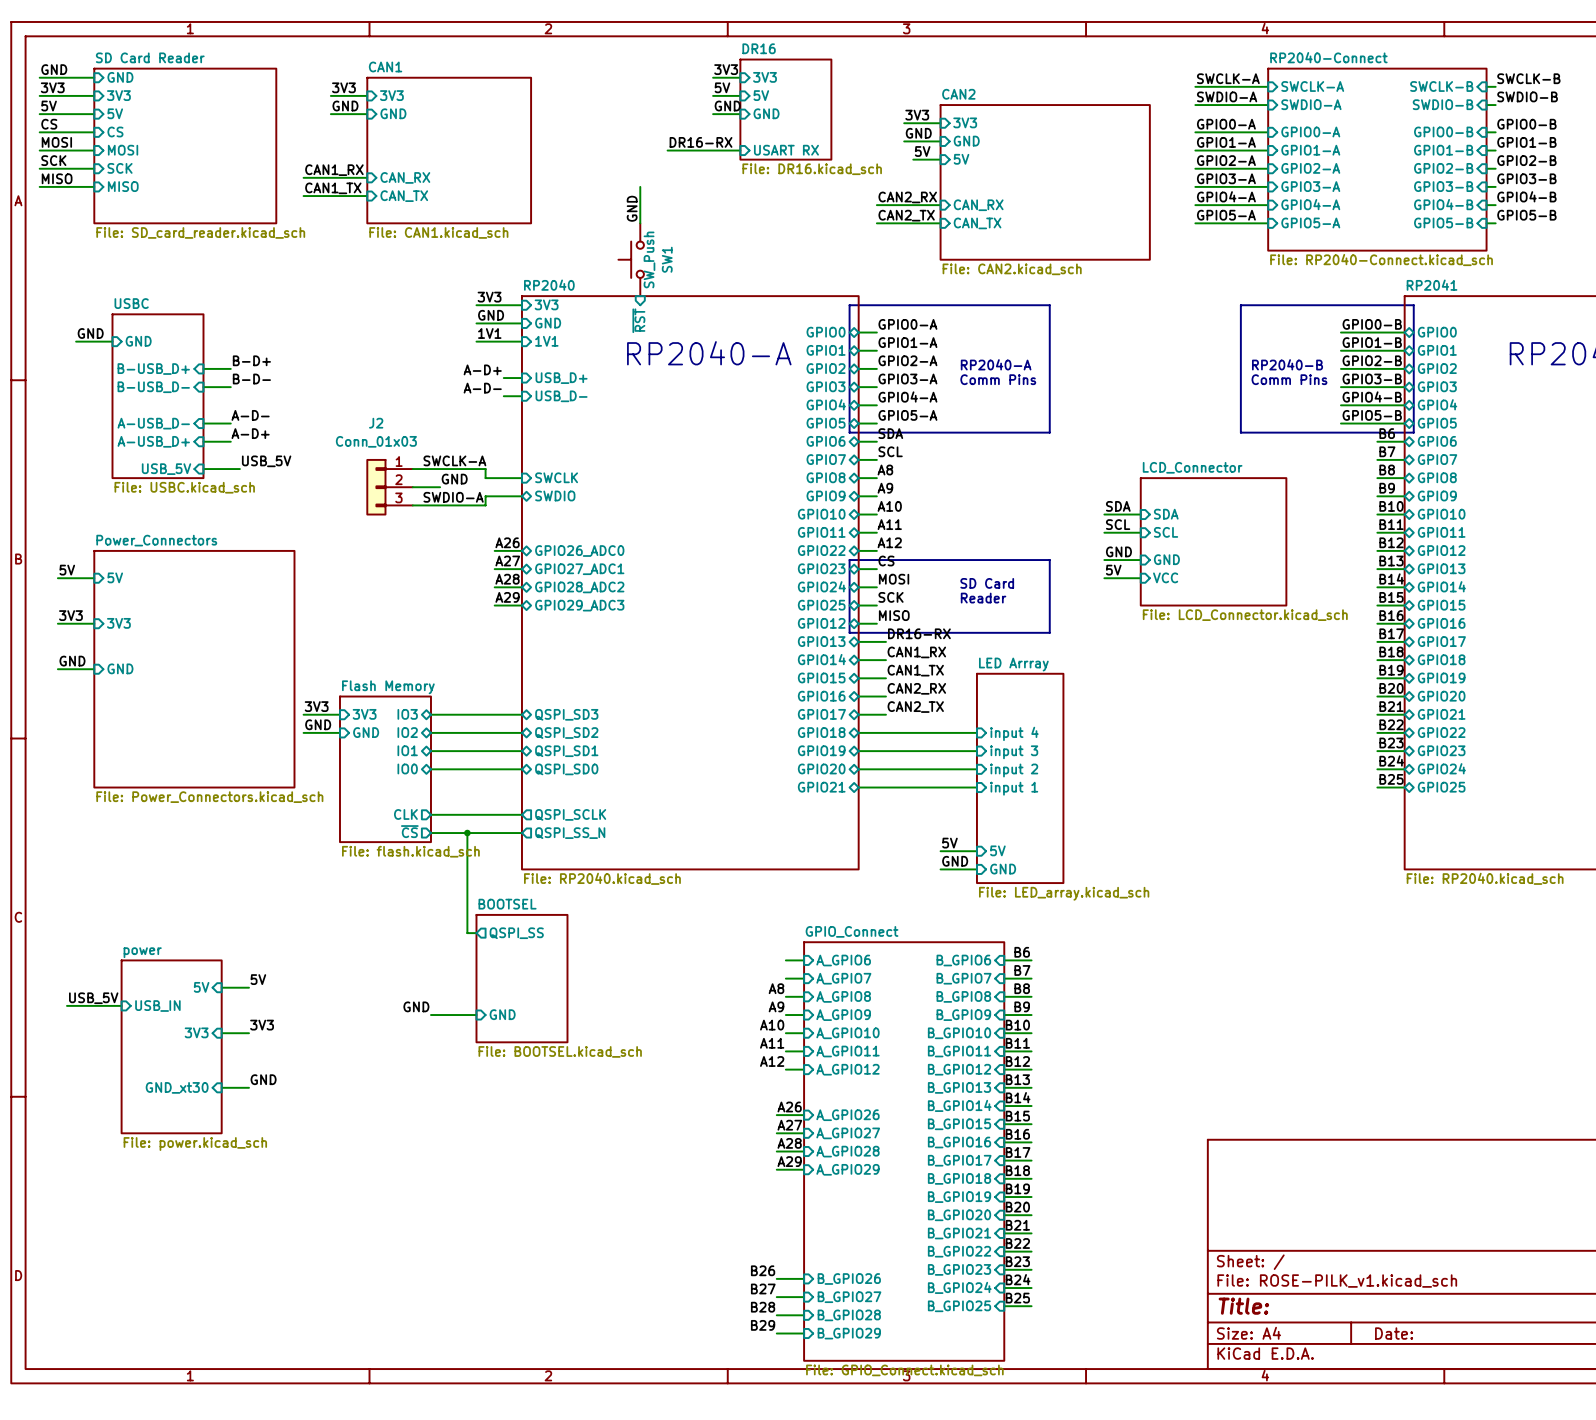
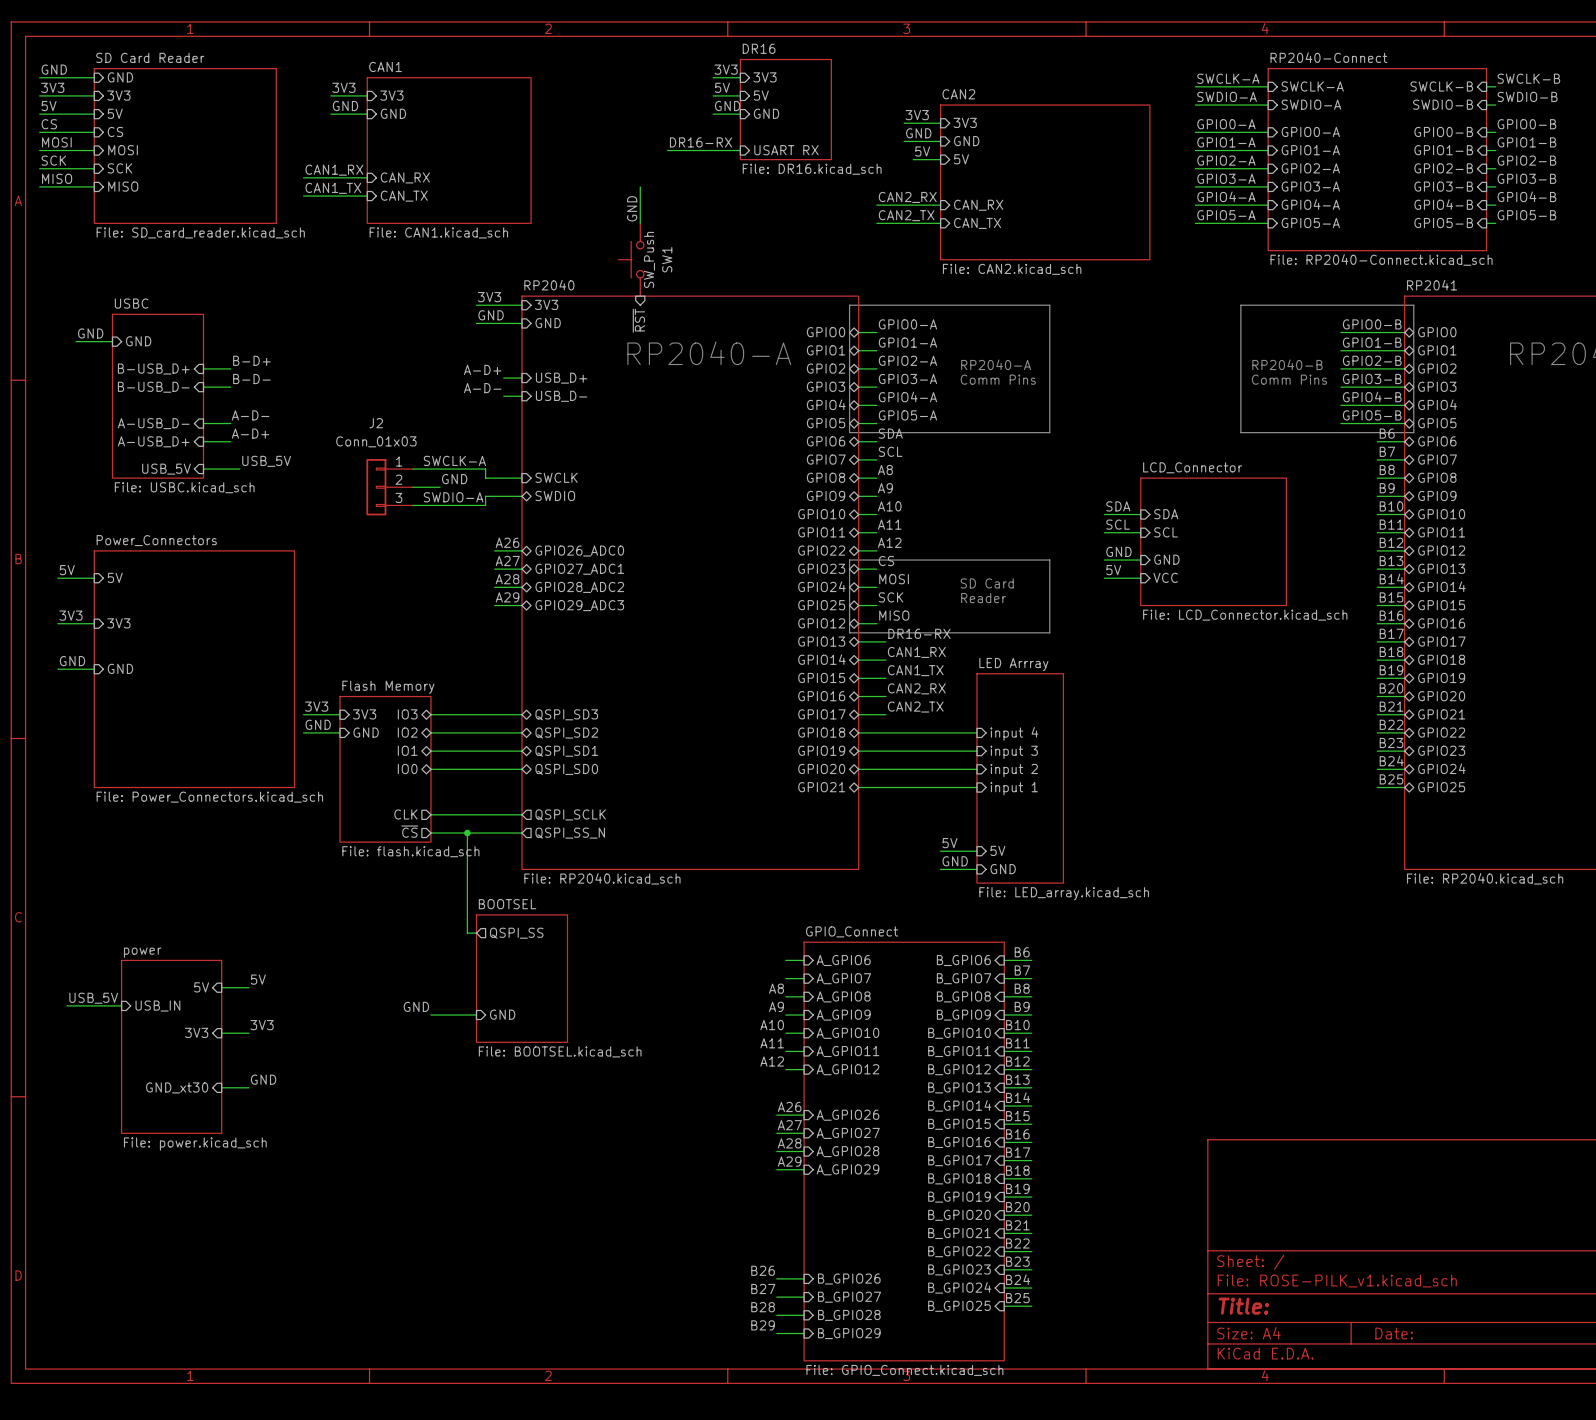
label: 1V1 (489, 333) -> none
wire: (476, 341) (521, 341) -> none
sheet pin: 1V1 (546, 341) -> none

